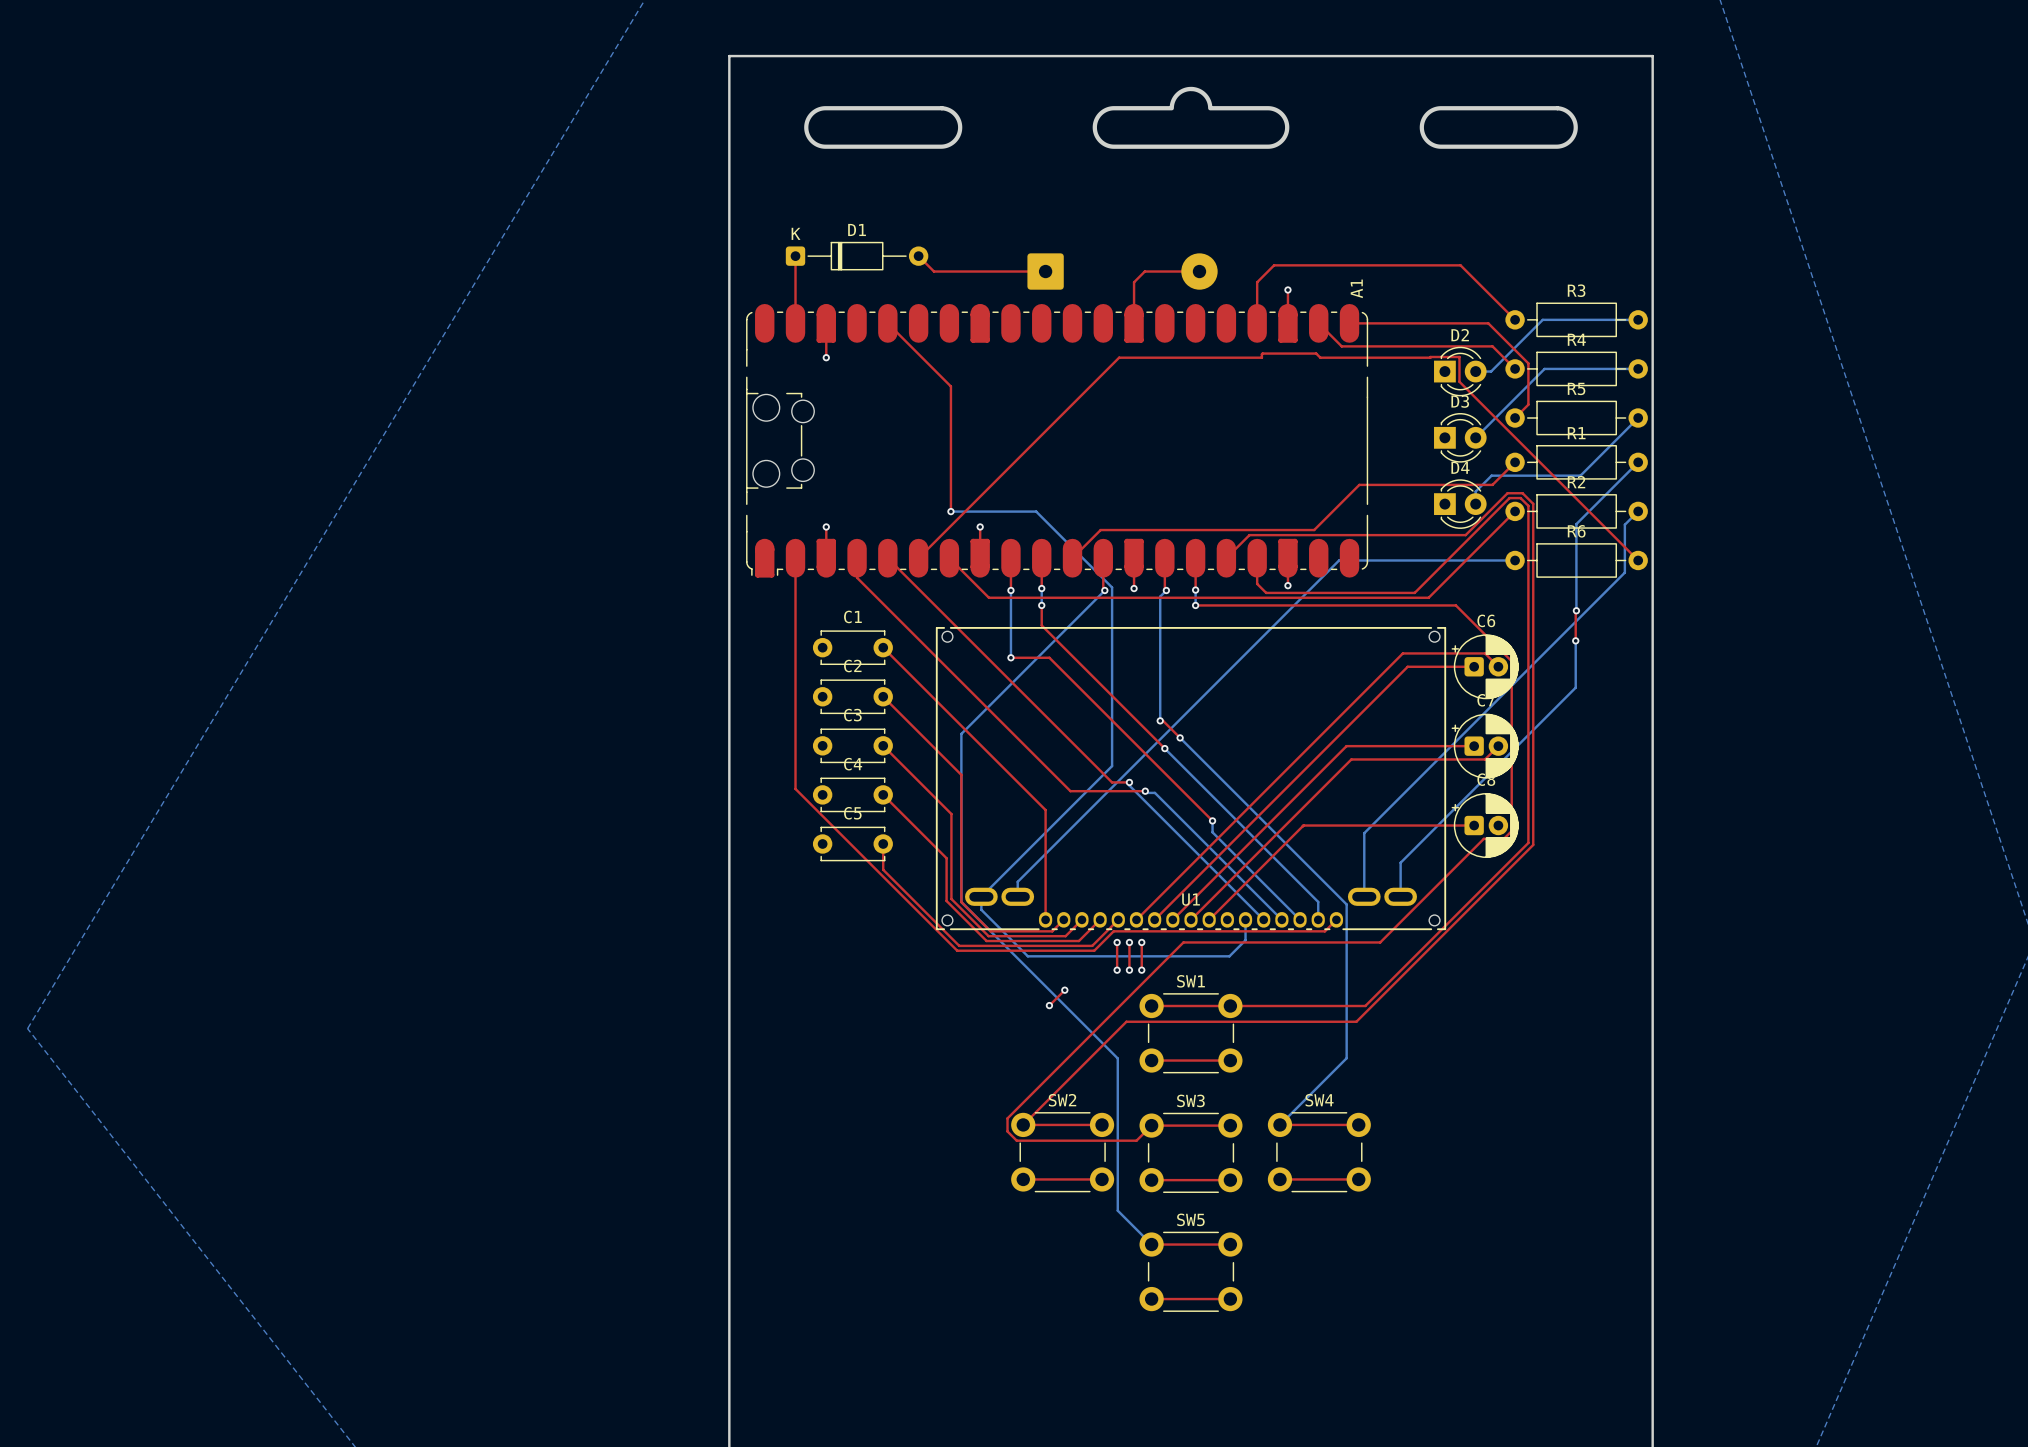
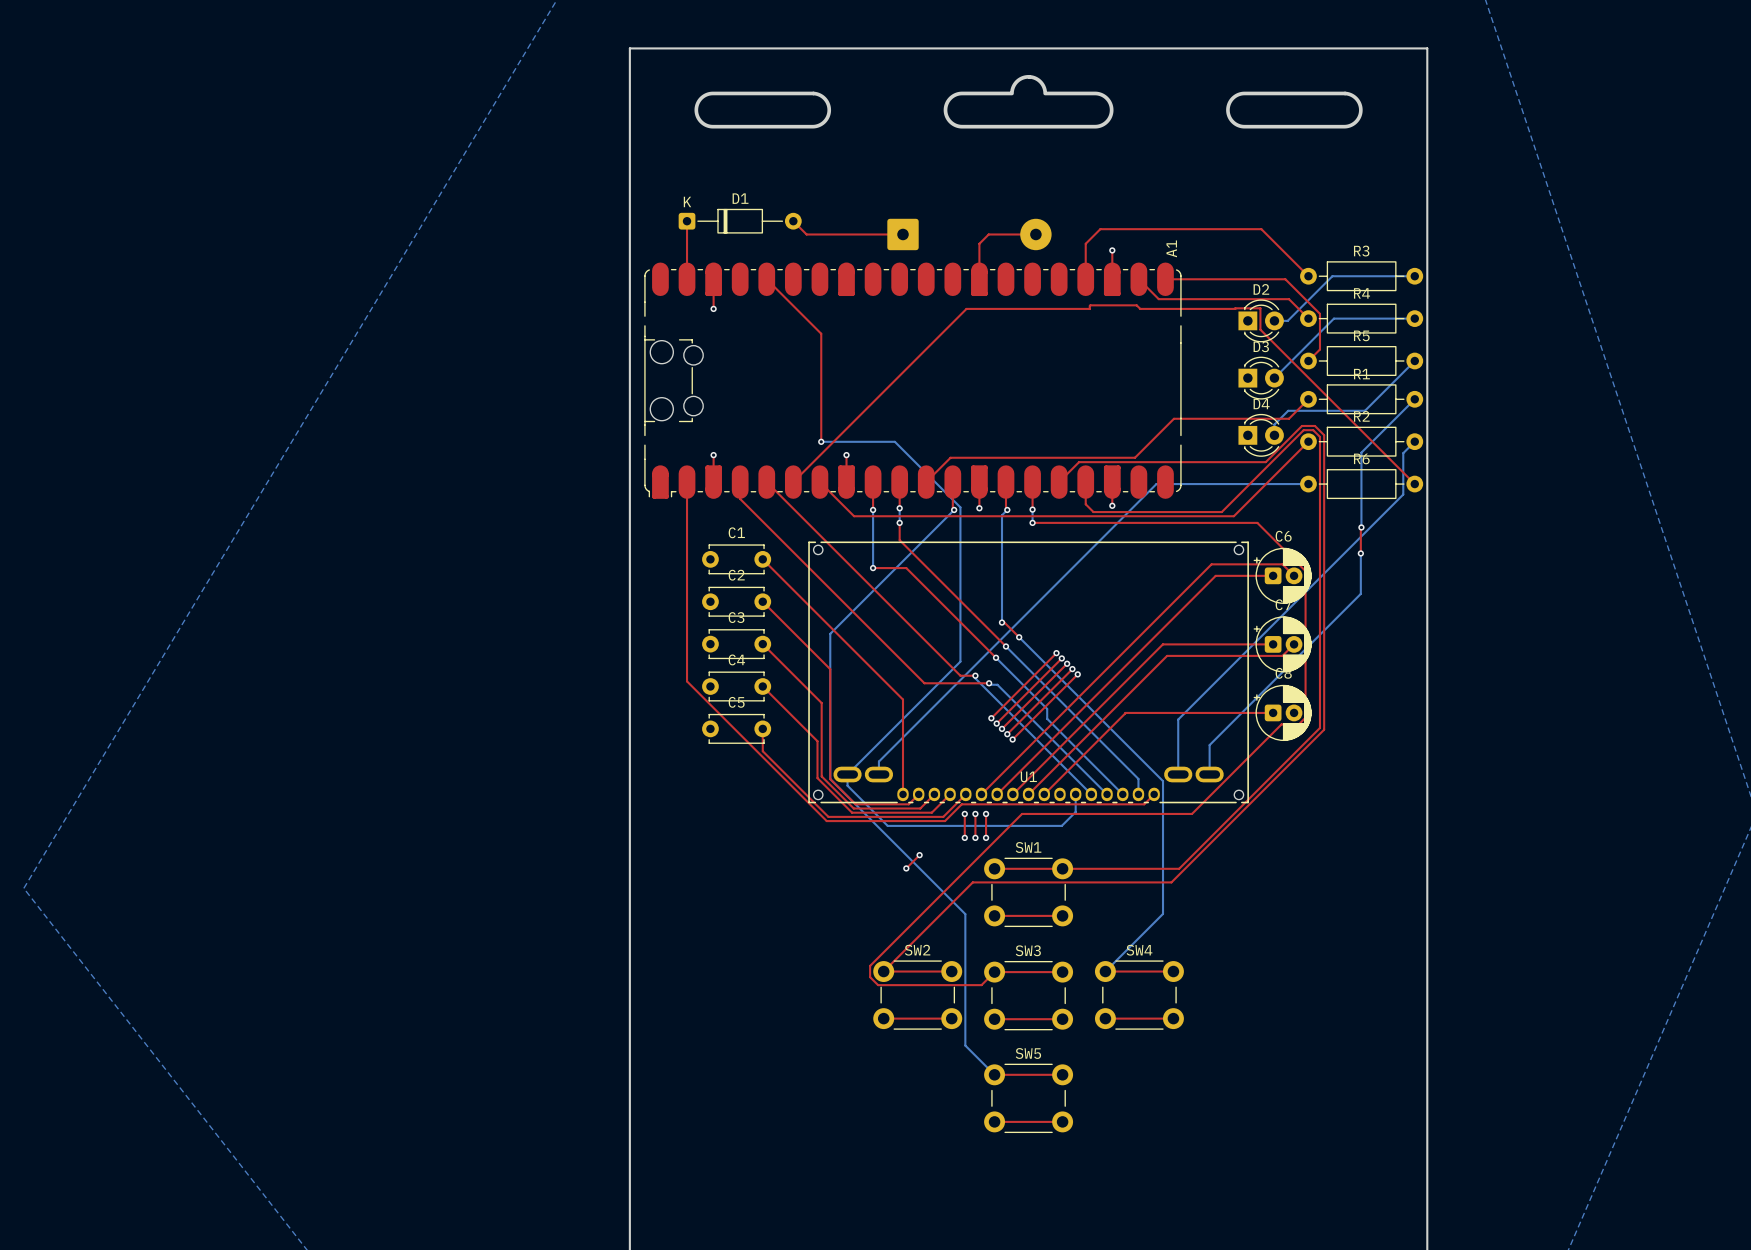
top track: none -> (1056, 653) (991, 718)
via: none -> (1056, 653)
top track: (1153, 761) (1212, 820) -> none
bottom track: none -> (996, 657) (1047, 708)
via: none -> (996, 657)
top track: none -> (1061, 658) (996, 723)
via: none -> (1061, 658)
top track: none -> (1067, 663) (1002, 728)
via: none -> (1067, 663)
top track: none -> (1072, 669) (1007, 734)
via: none -> (1072, 669)
top track: none -> (1077, 674) (1012, 739)
via: none -> (1077, 674)
via: (1212, 820) -> none
via: none -> (991, 718)
via: none -> (996, 723)
via: none -> (1002, 728)
via: none -> (1007, 734)
via: none -> (1012, 739)

